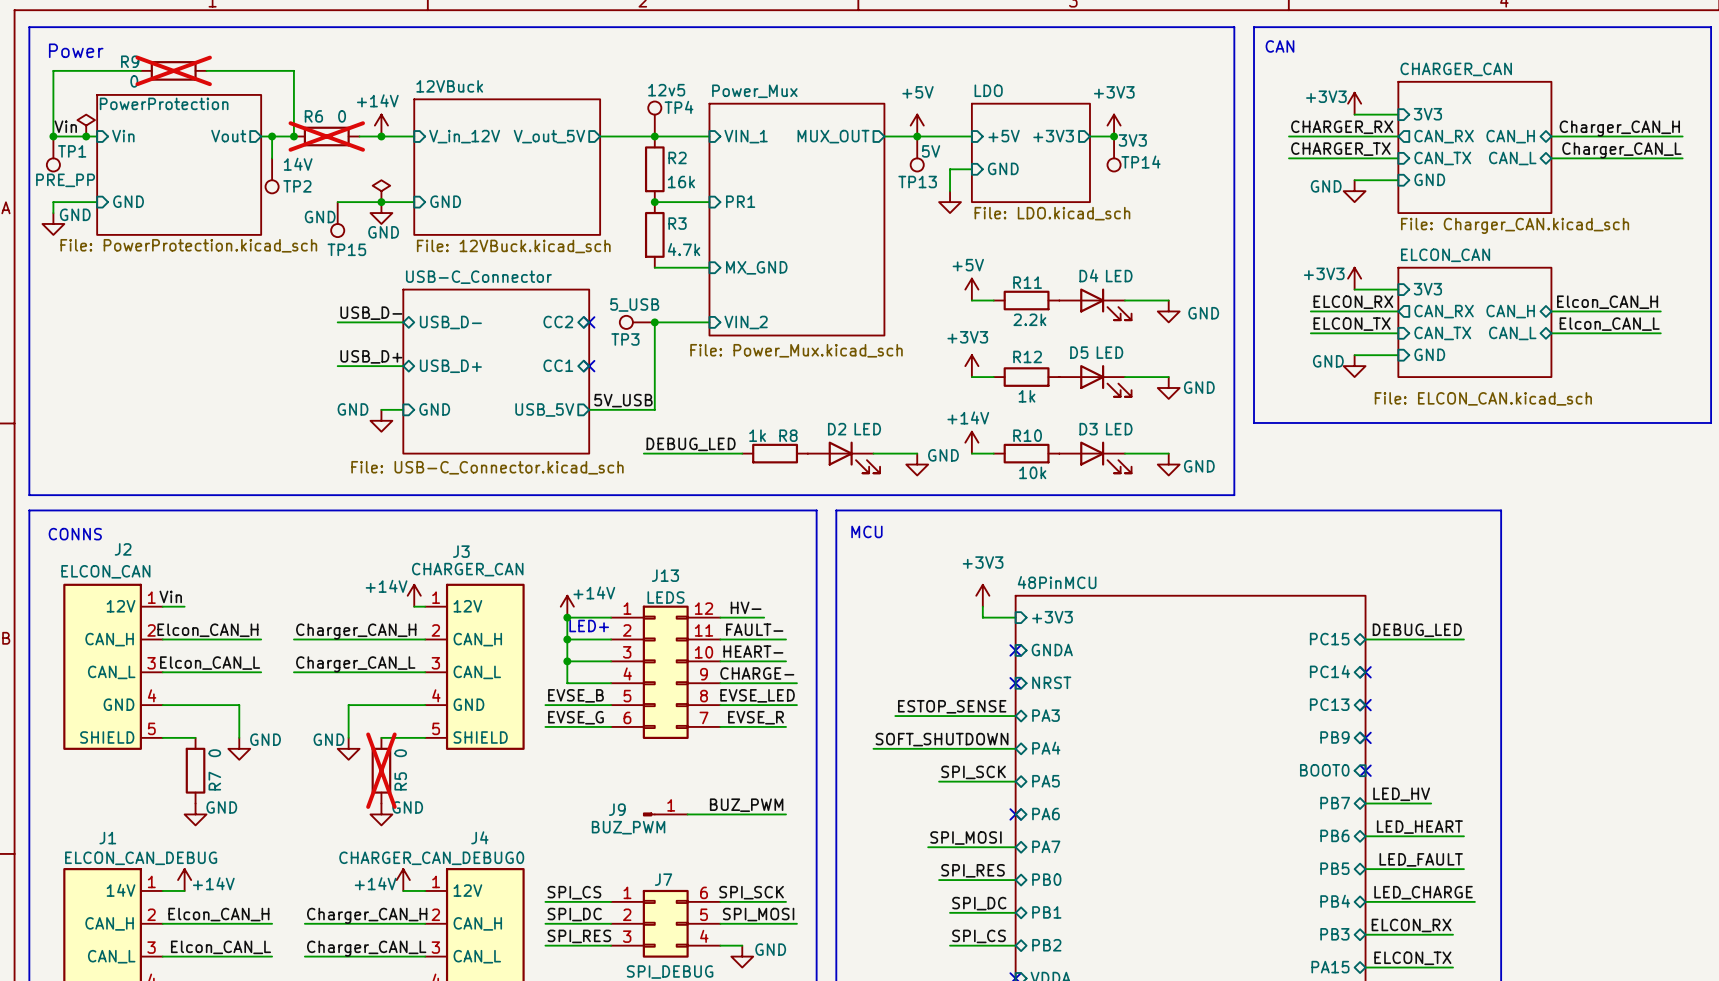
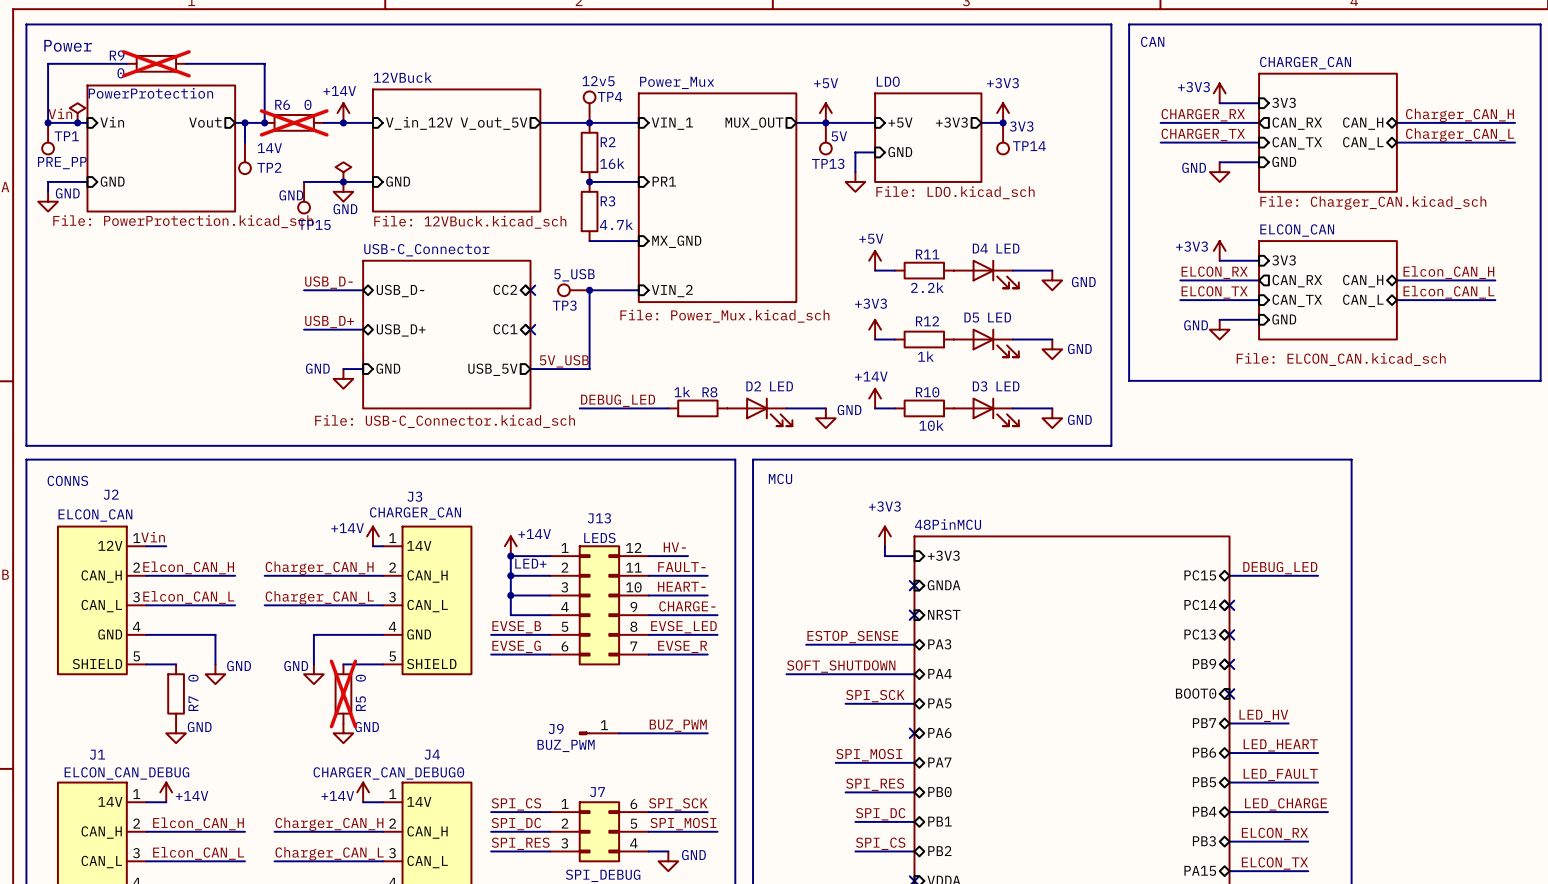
J3 pin name: 12V (467, 606) -> 14V (419, 545)
J4 pin name: 12V (467, 890) -> 14V (419, 801)

